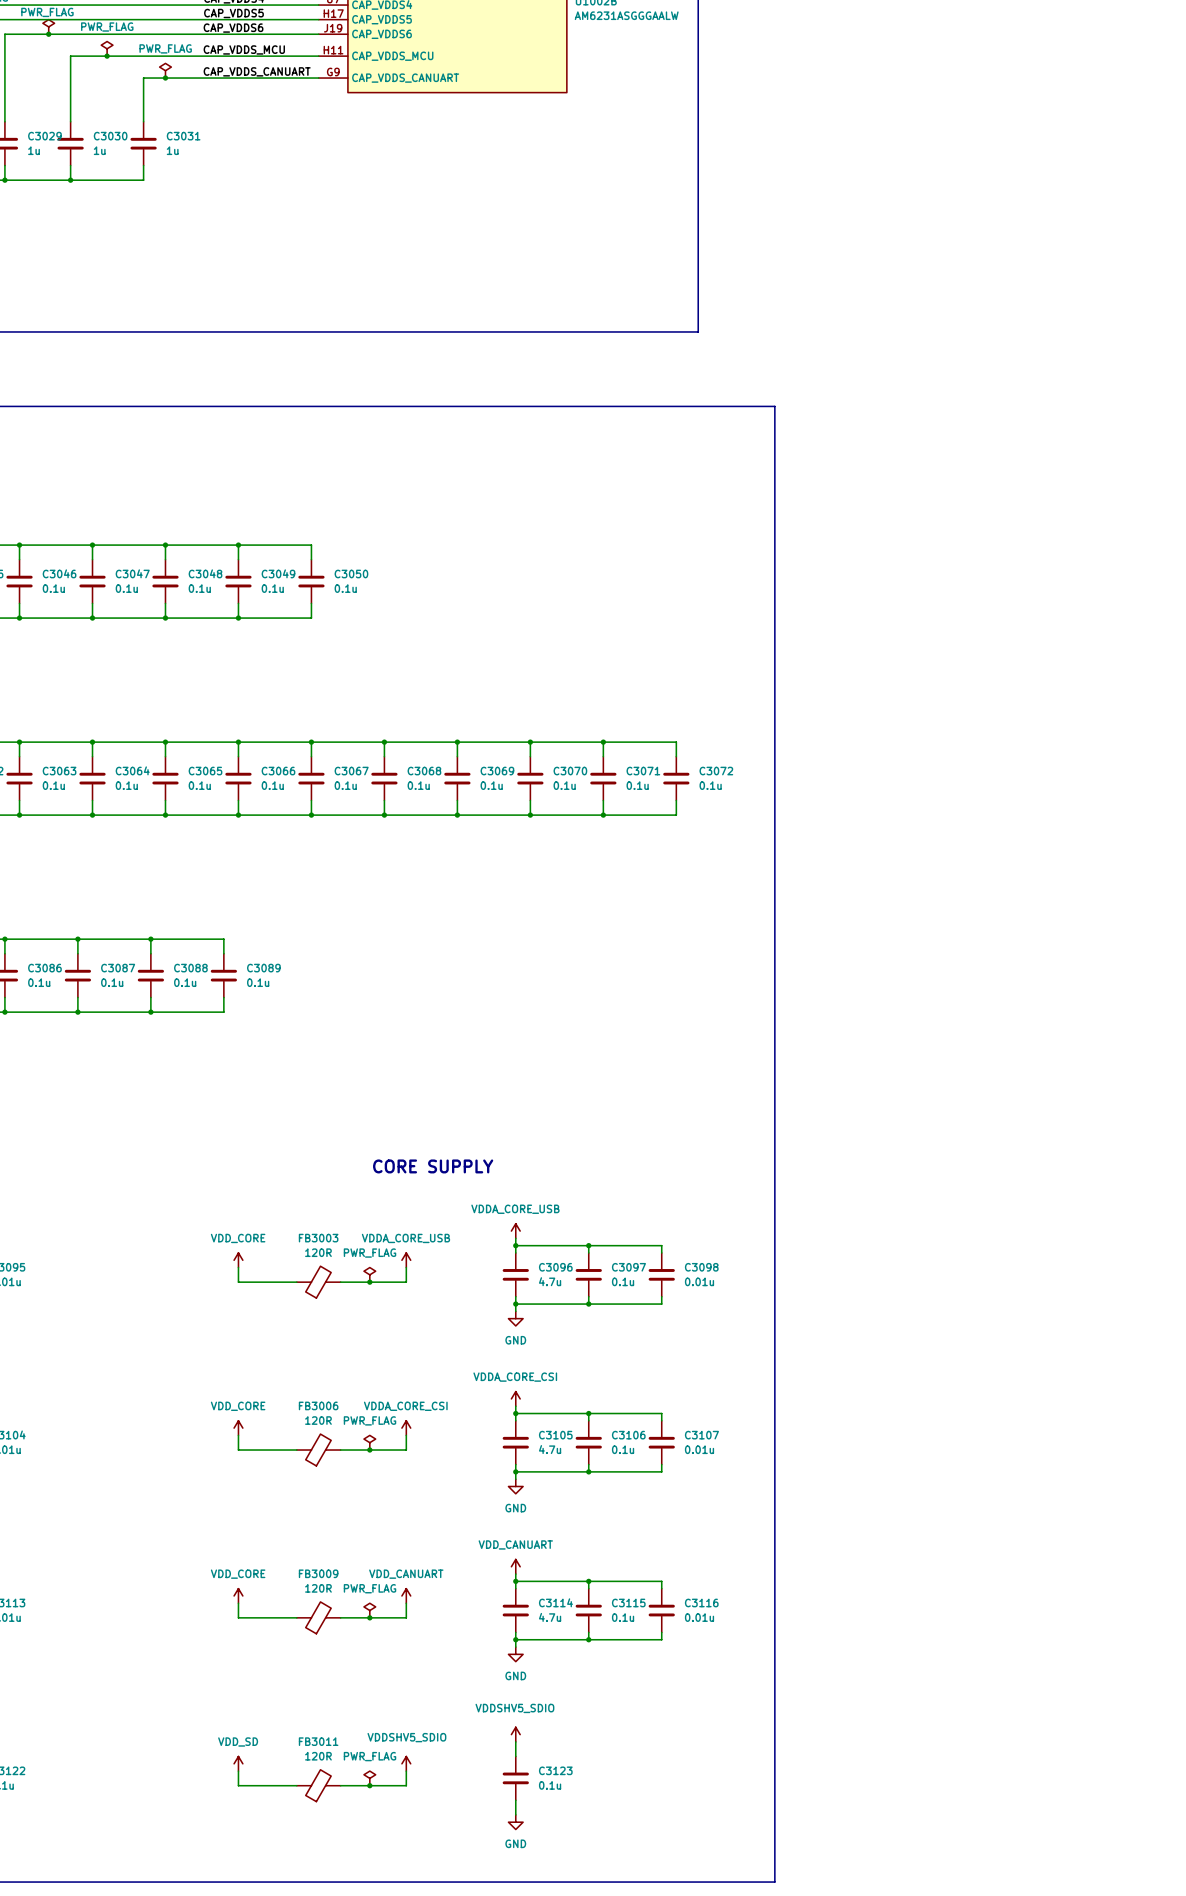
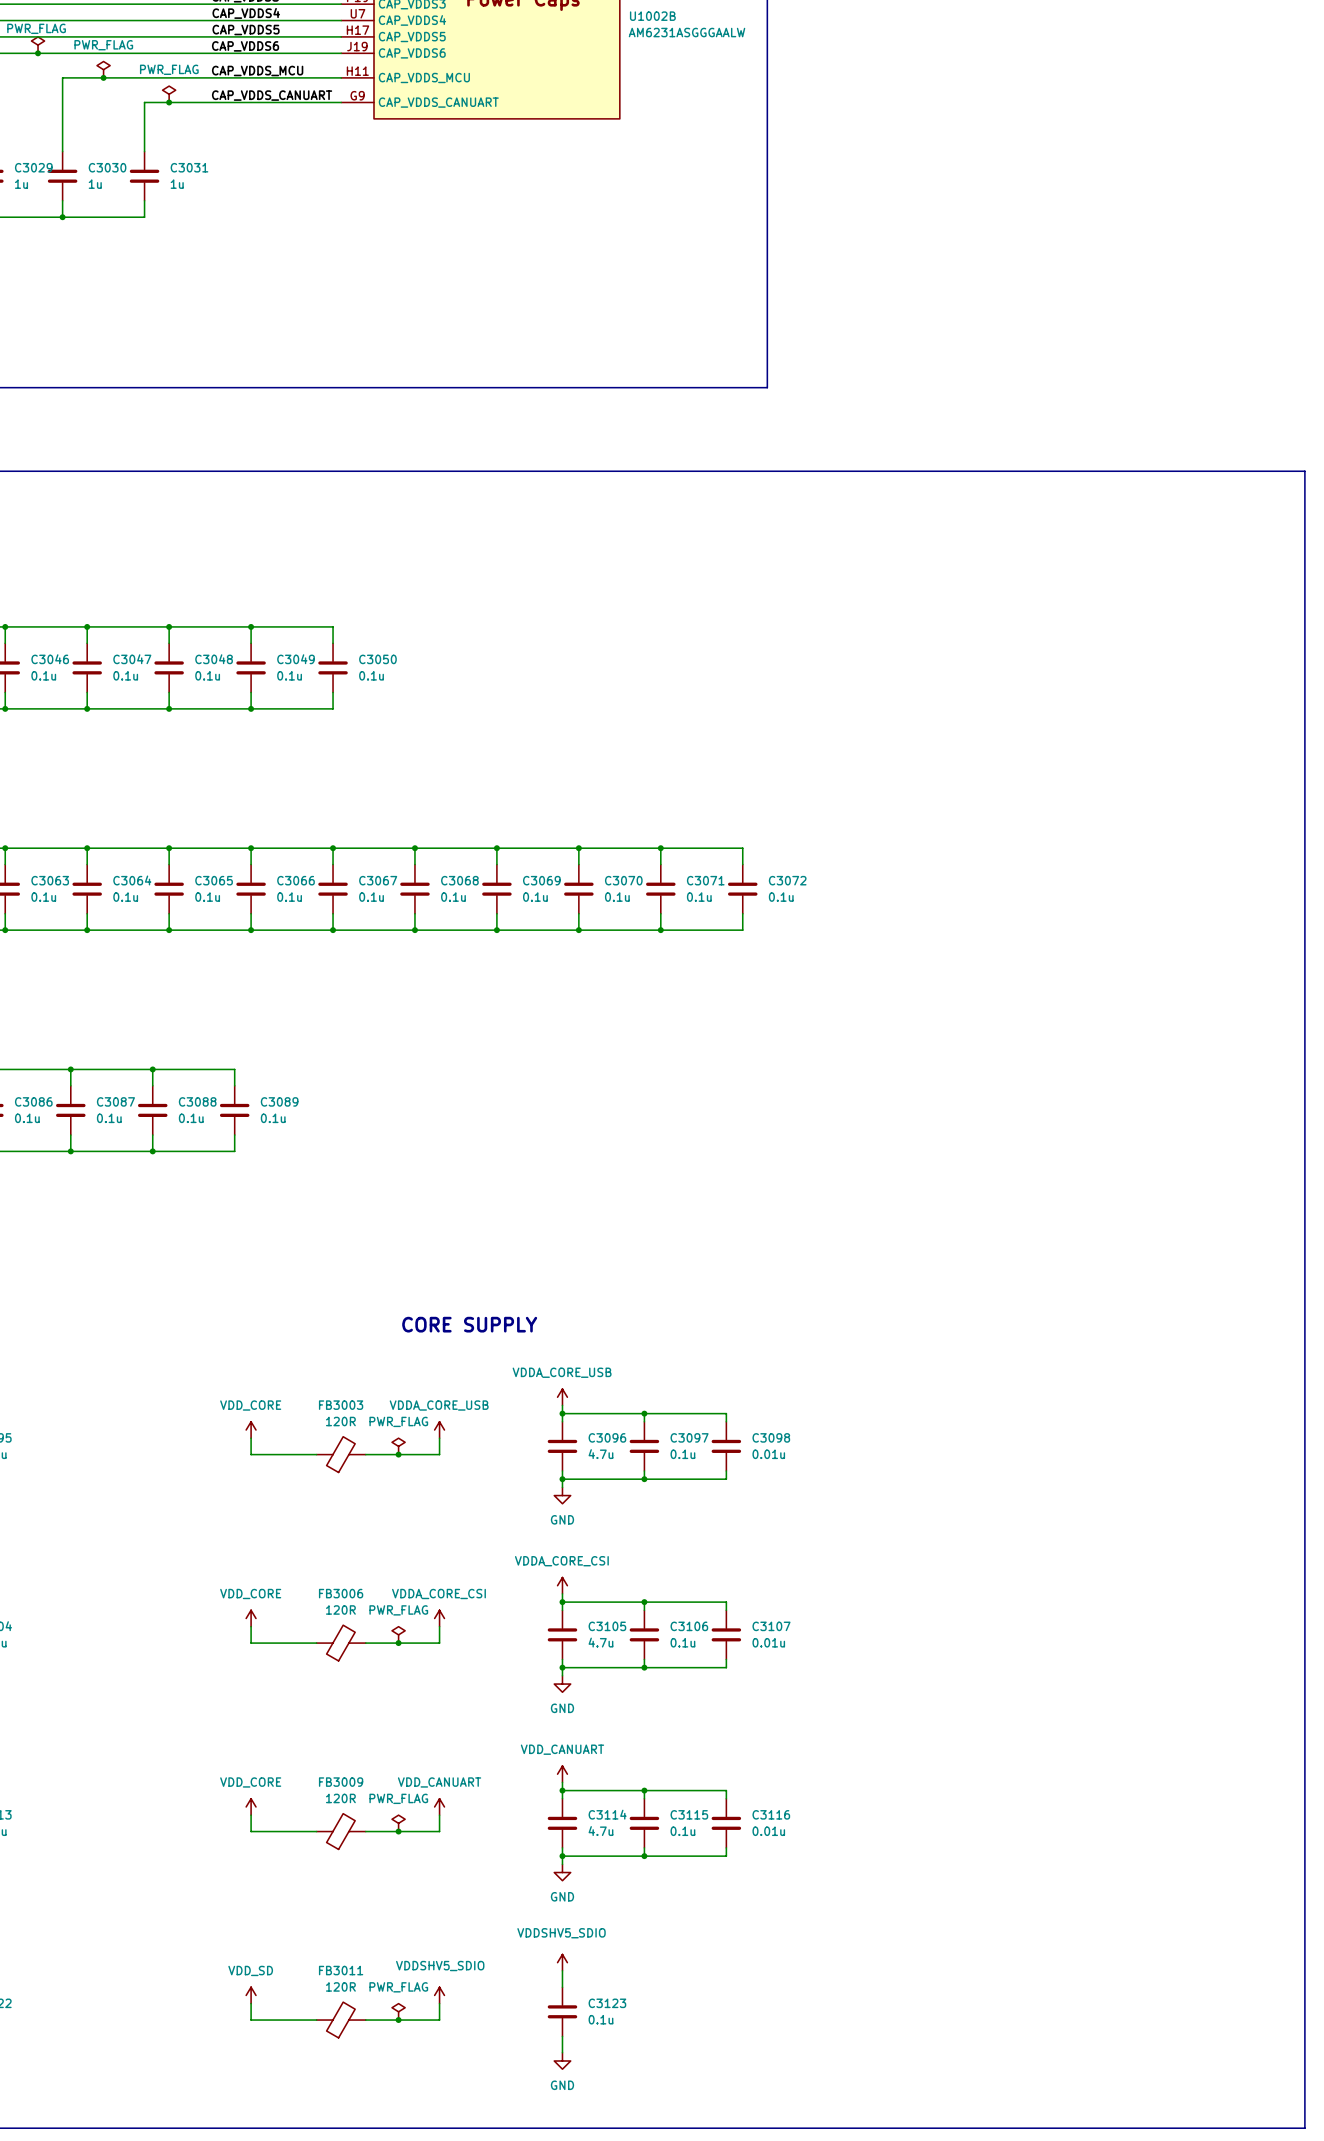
line: (774, 406) (774, 1882) -> (853, 471) (1304, 471) (1304, 2128) (853, 2128)

